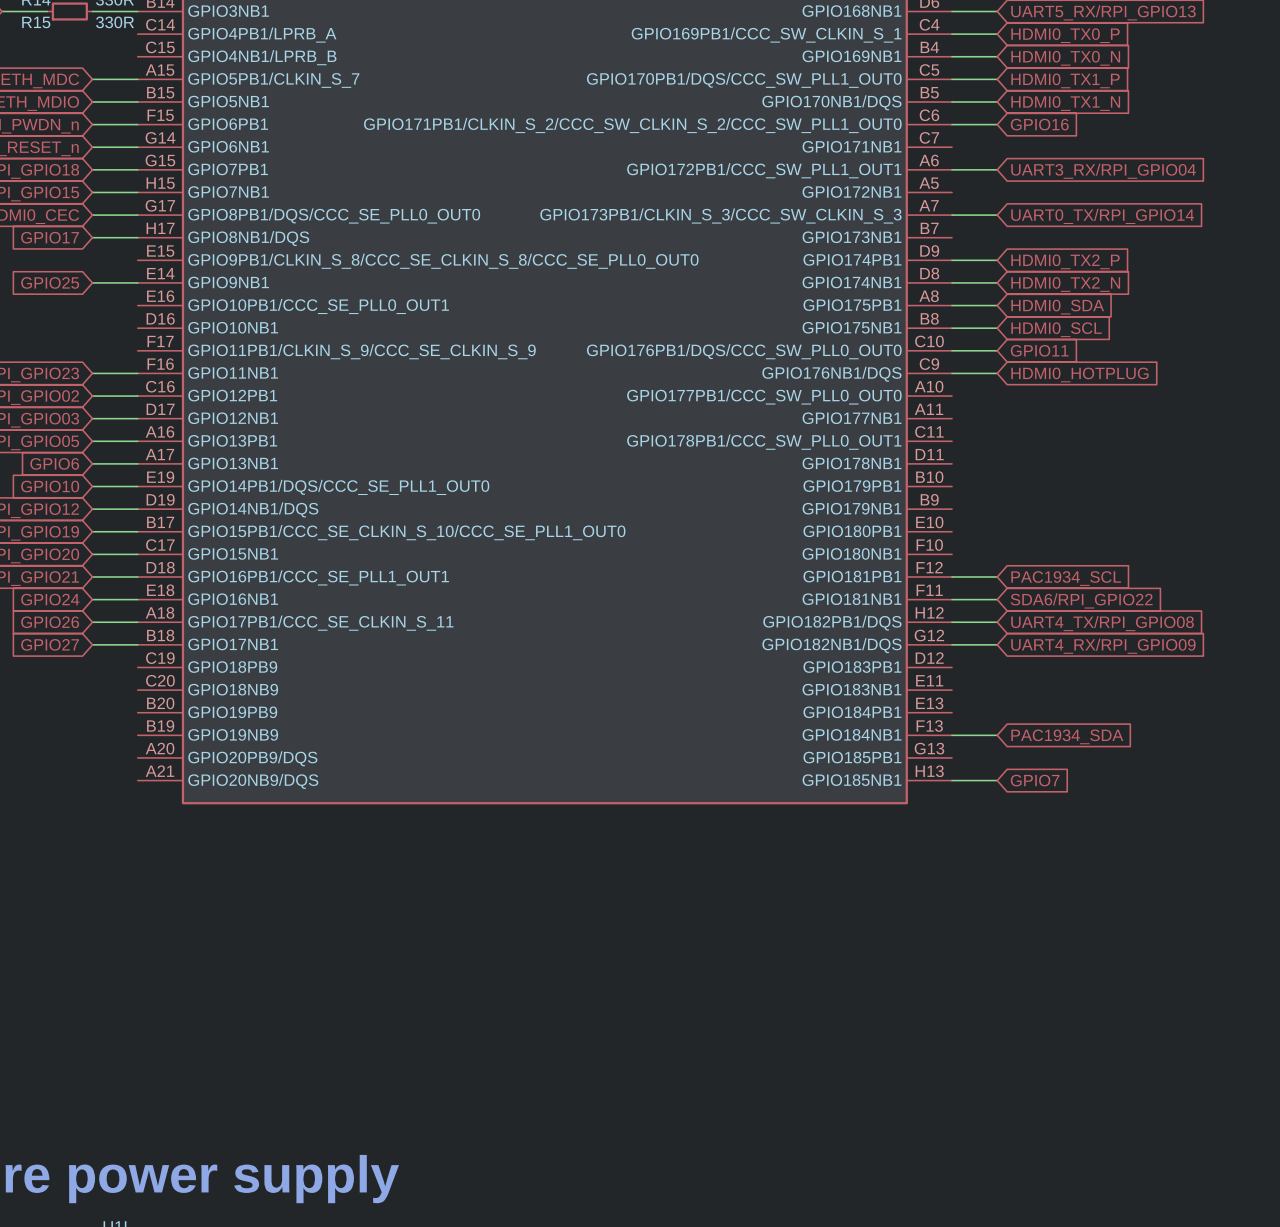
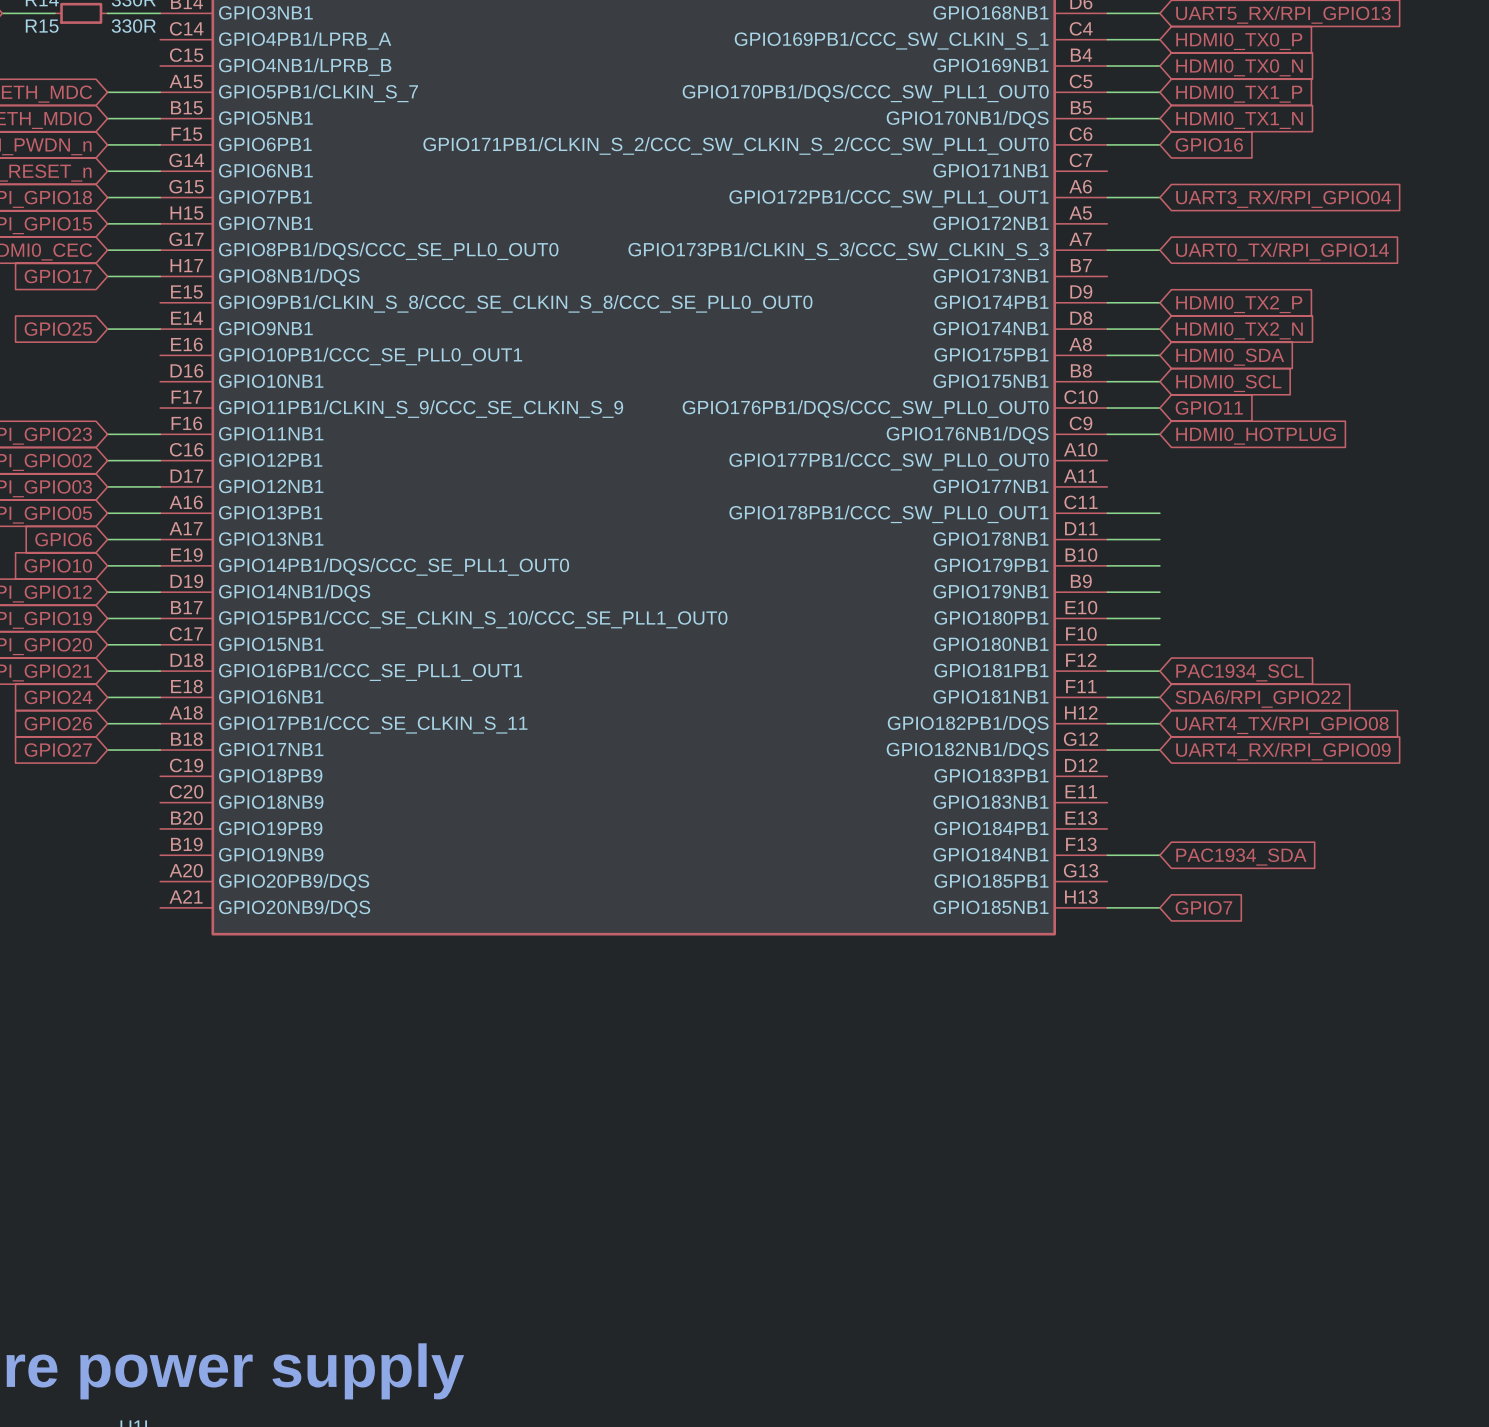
wire: none -> (1107, 513) (1159, 513)
wire: none -> (1107, 539) (1159, 539)
wire: none -> (1107, 565) (1159, 565)
wire: none -> (1107, 592) (1159, 592)
wire: none -> (1107, 618) (1159, 618)
wire: none -> (1107, 644) (1159, 644)

